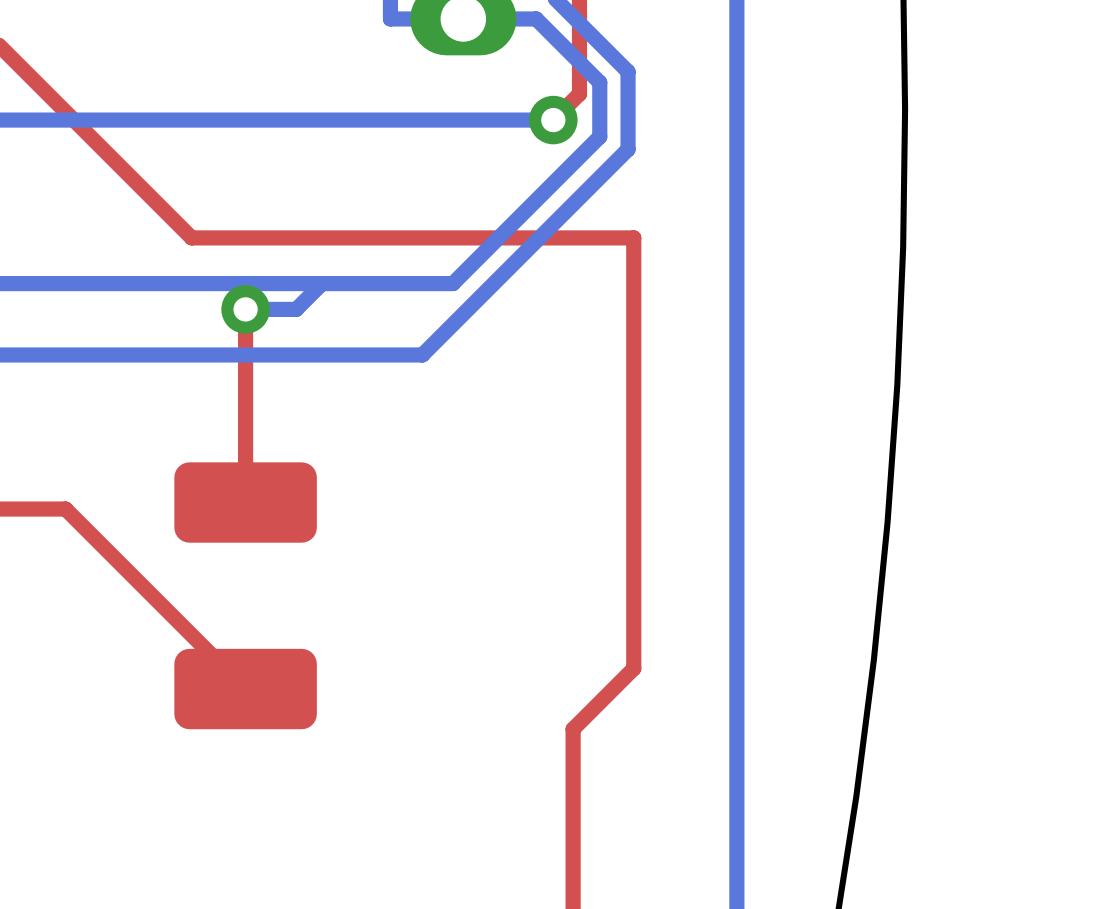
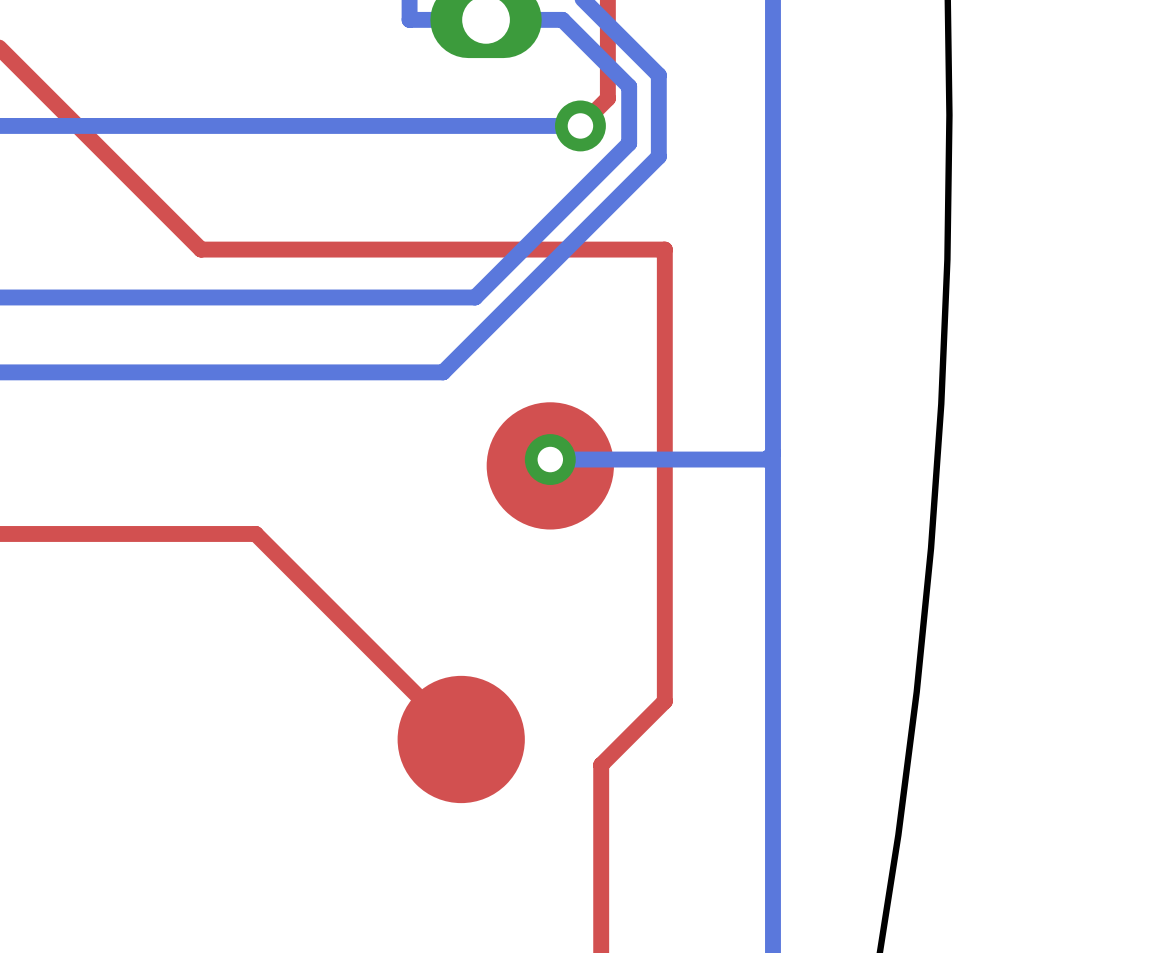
bottom track: (322, 283) (296, 309) (245, 309) -> none
top track: (245, 309) (245, 502) -> none
via position: (245, 309) -> (550, 459)
bottom track: none -> (772, 453) (766, 459) (550, 459)
part: none -> (550, 465)
top track: (65, 509) (245, 689) -> (68, 533) (255, 533) (461, 739)
part: (245, 595) -> none
part: none -> (461, 739)

